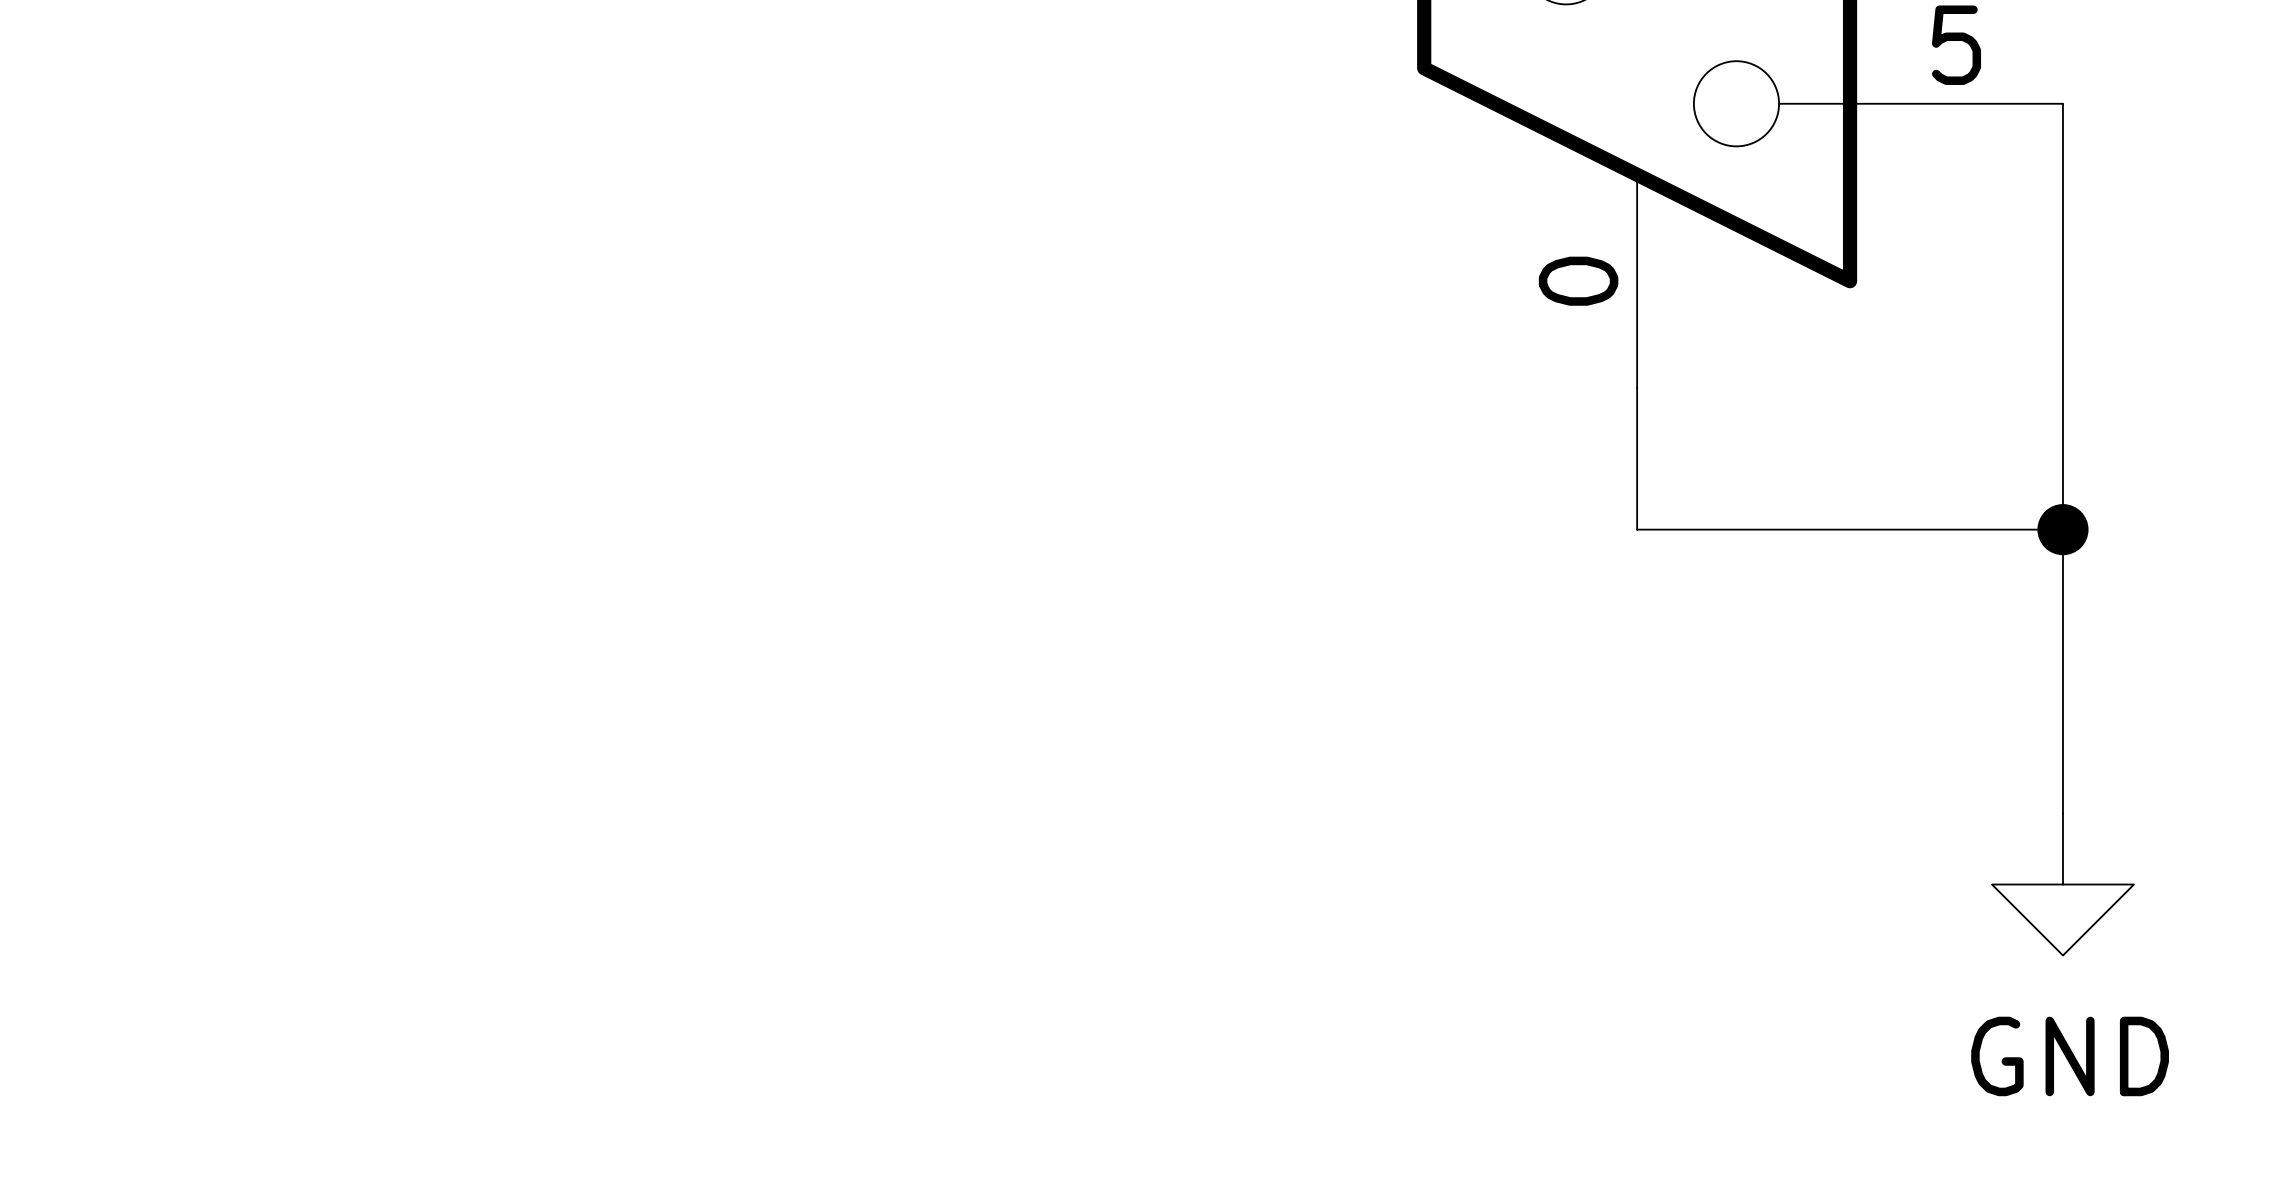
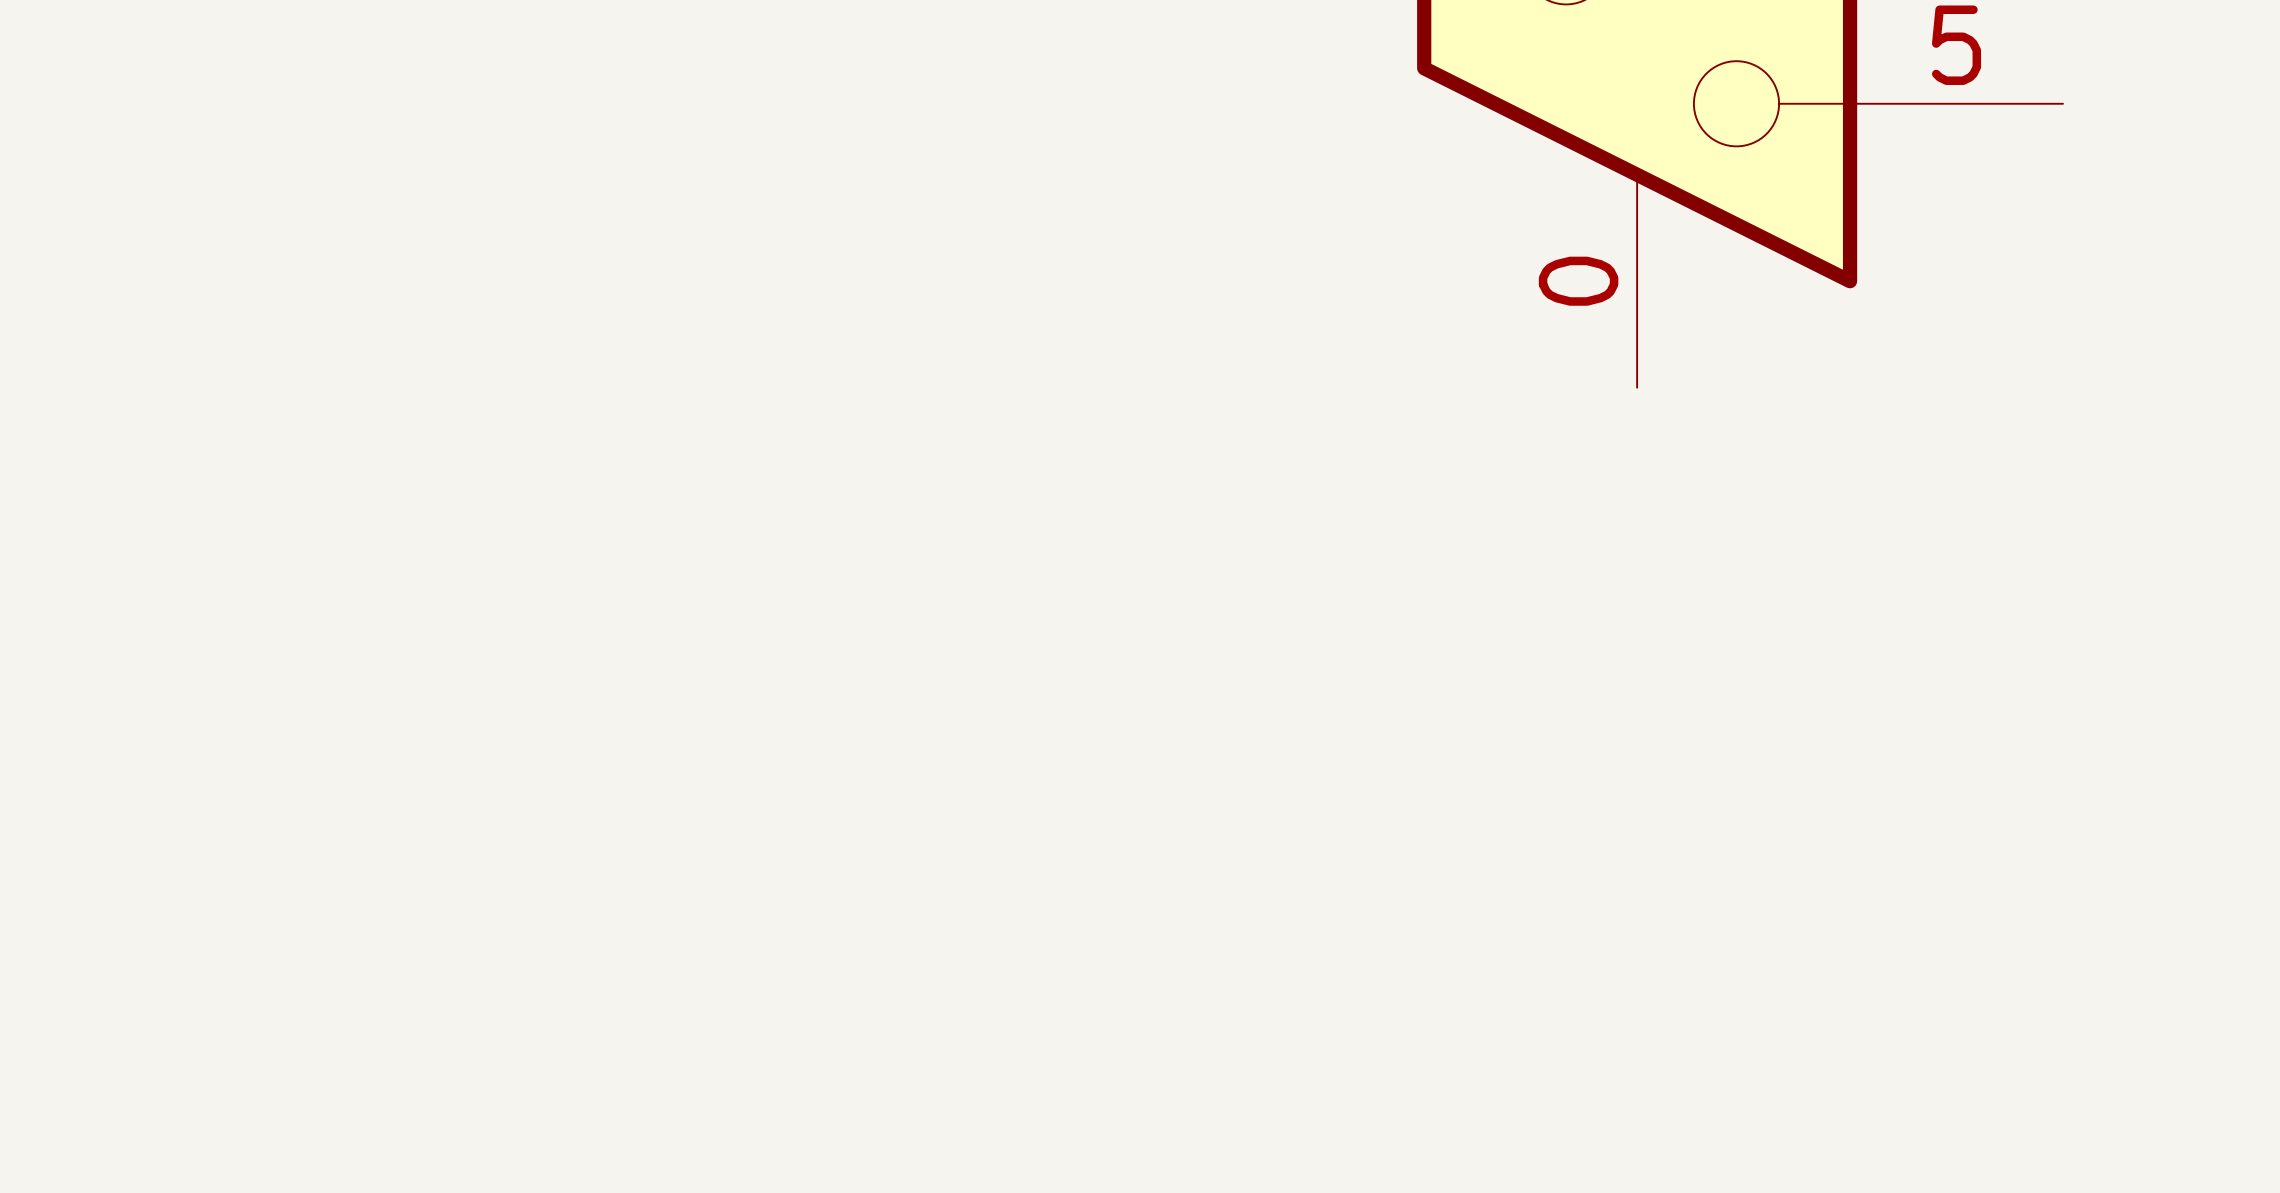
wire: (2062, 103) (2062, 813) -> none
wire: (1637, 387) (1637, 529) (2062, 529) -> none
junction: (2062, 529) -> none
power symbol: GND (2062, 884) -> none

